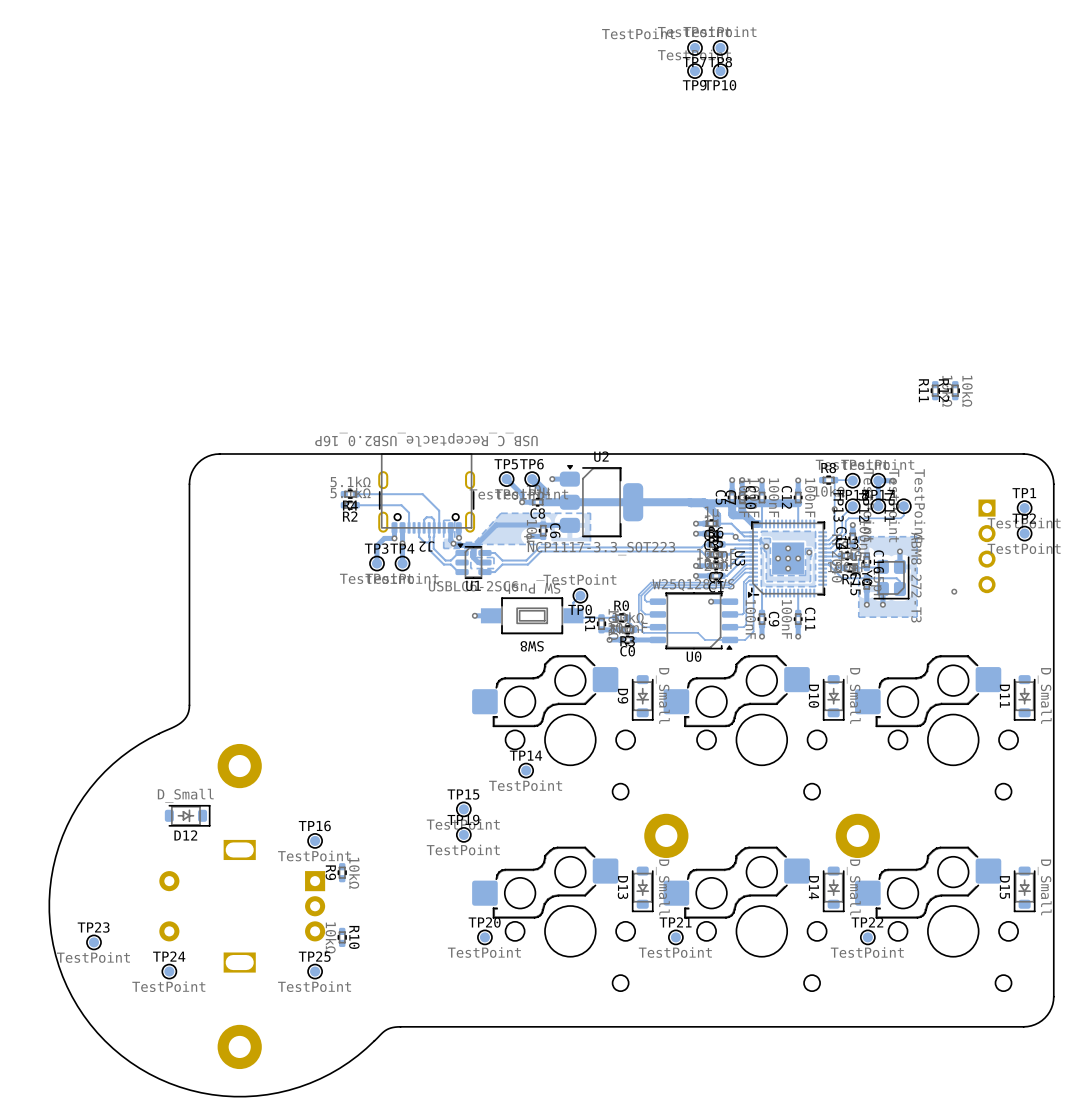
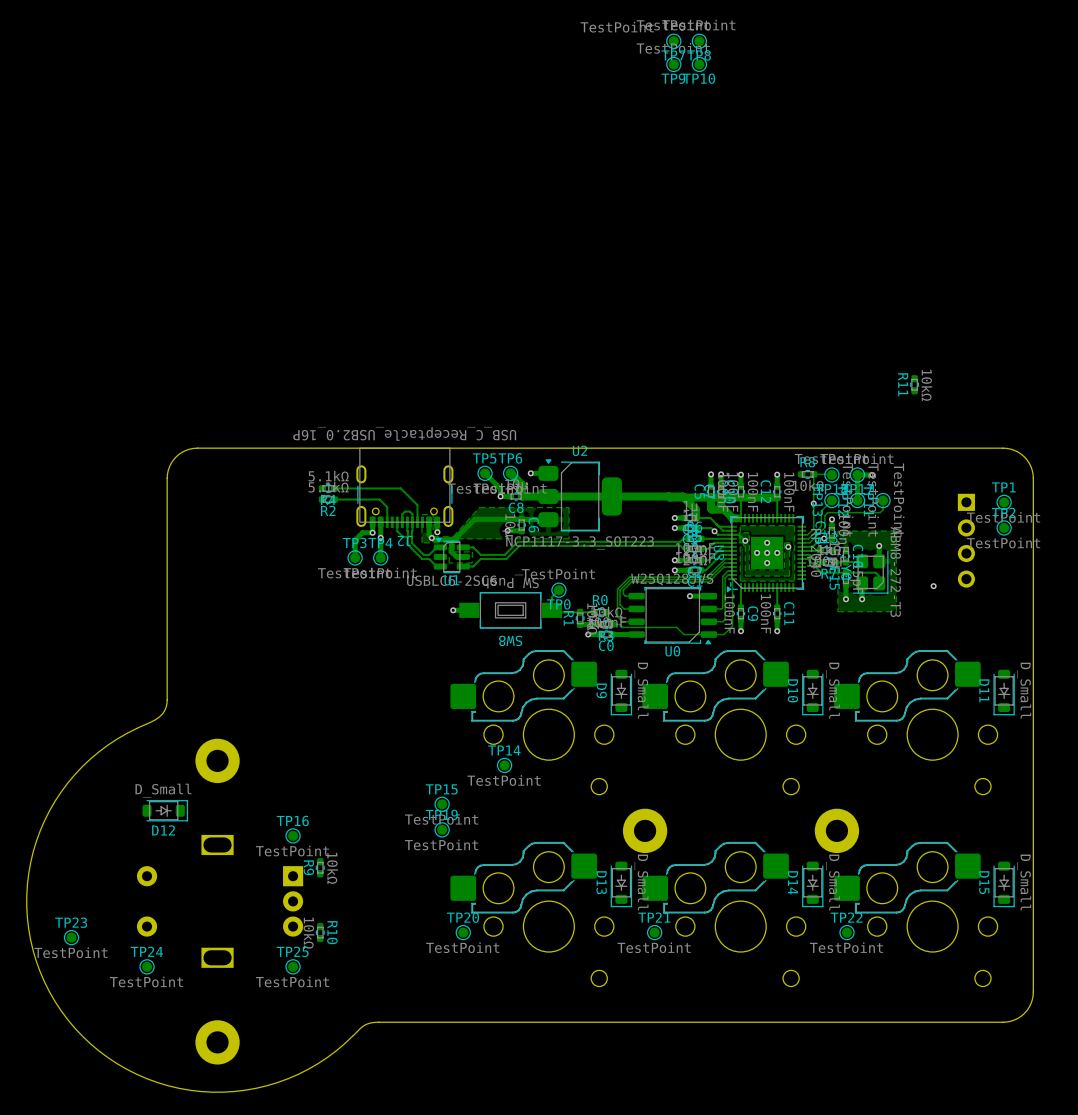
R12: 10kΩ (955, 390) -> none

